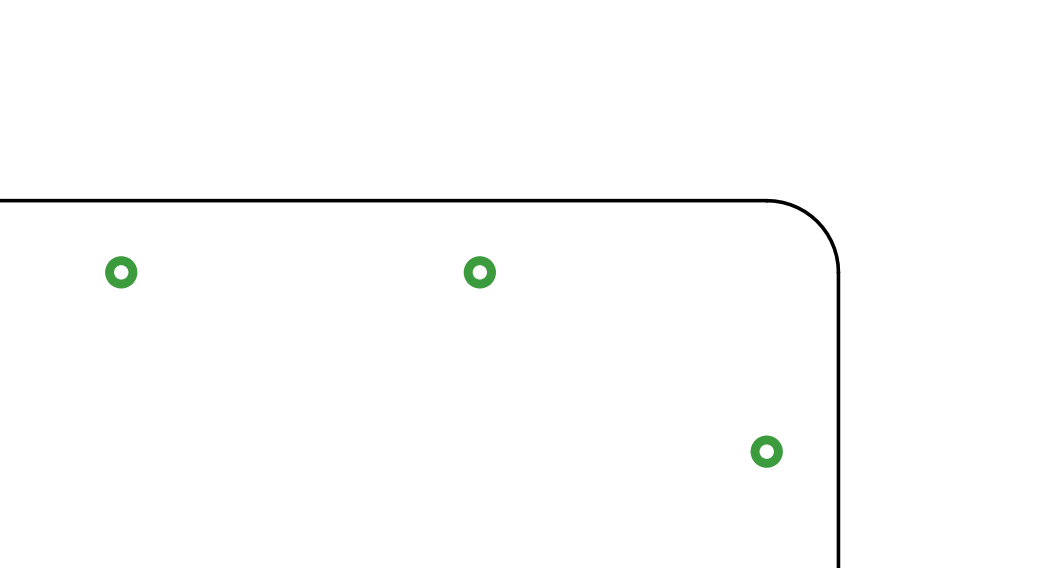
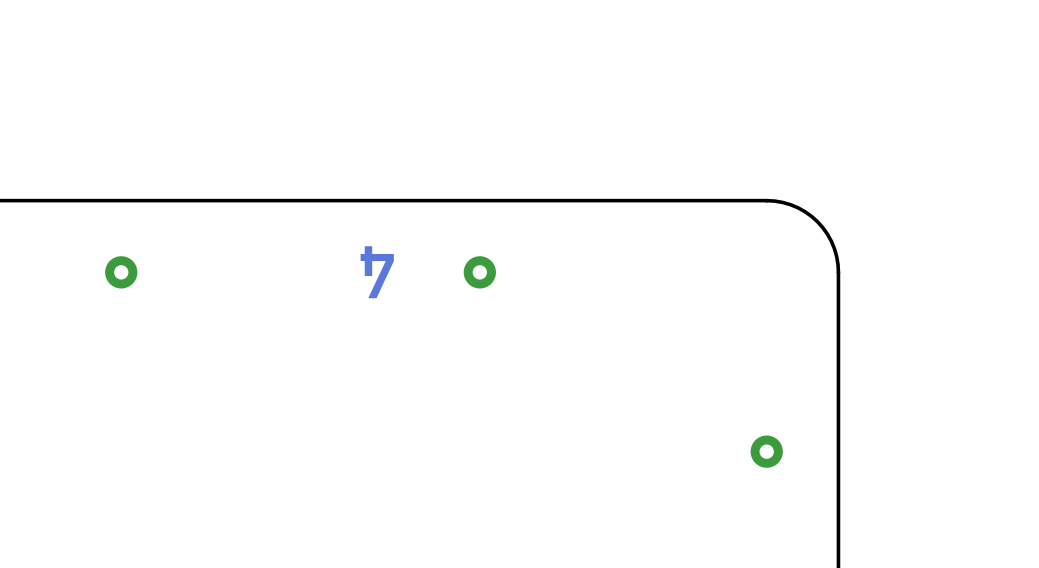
drawing: none -> [360, 246, 394, 299]

